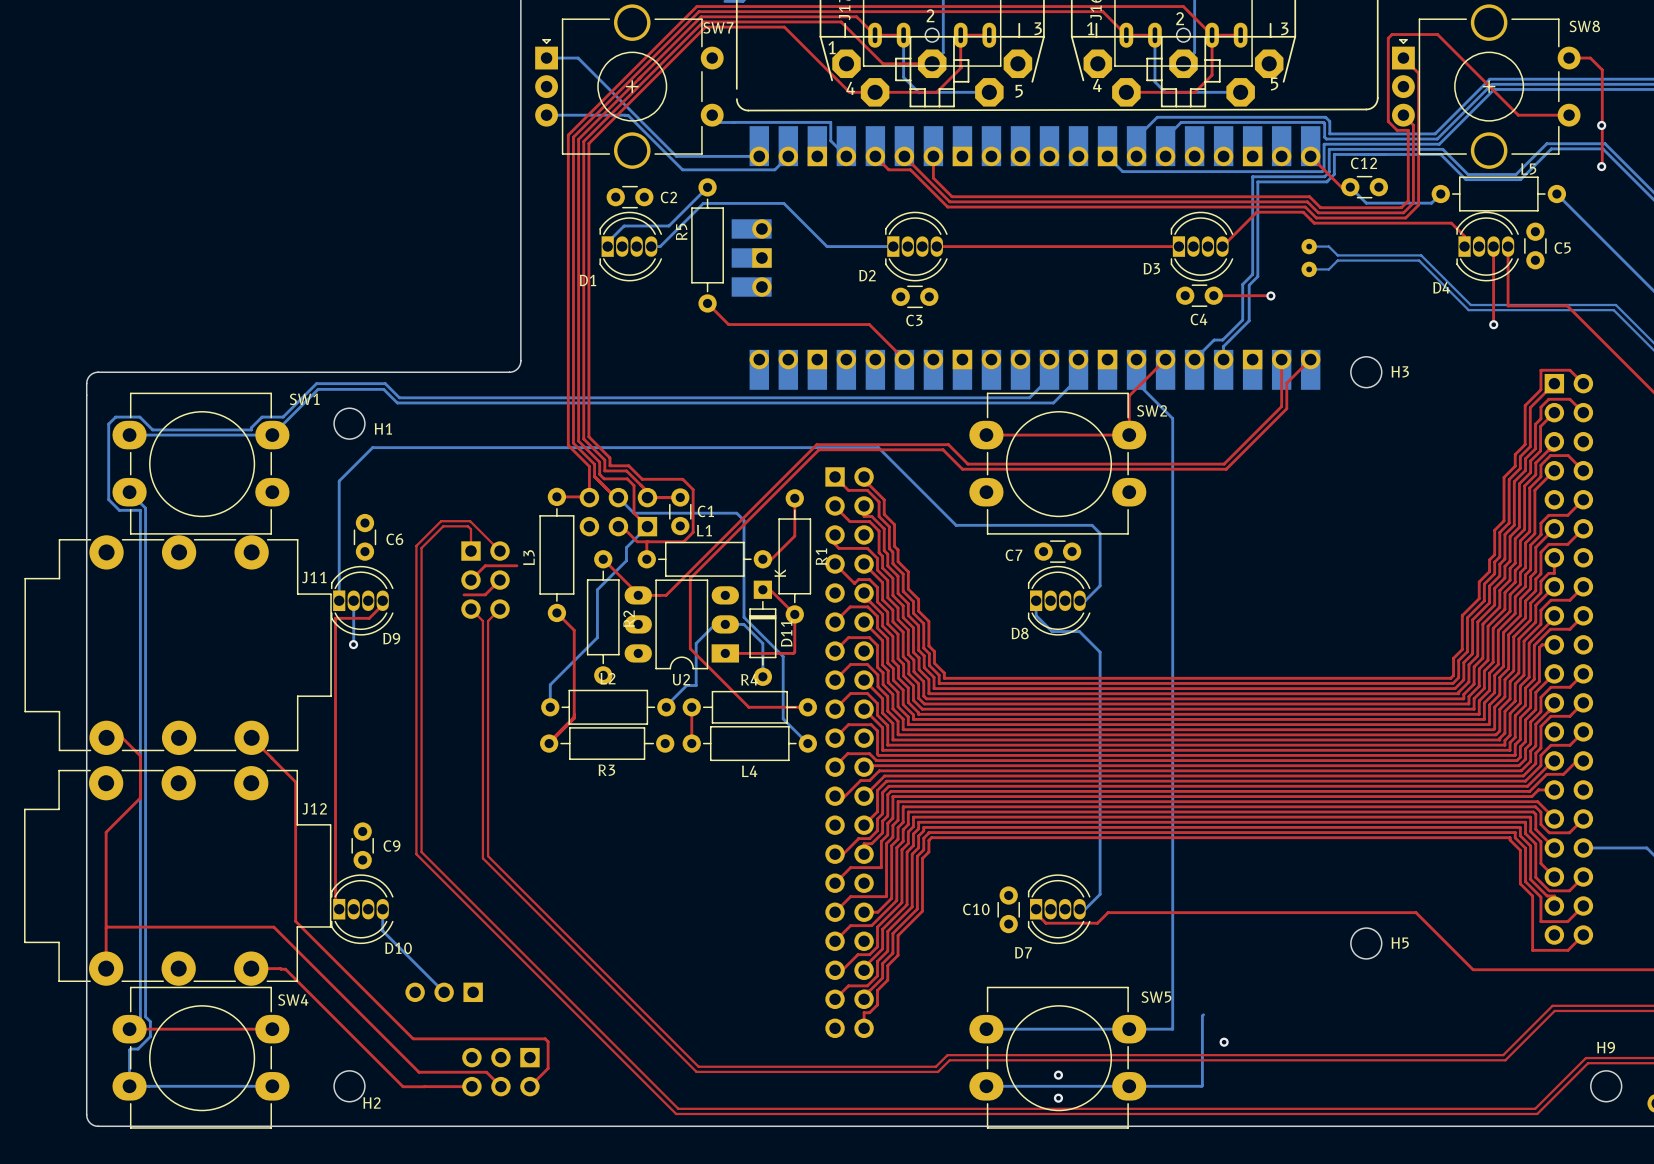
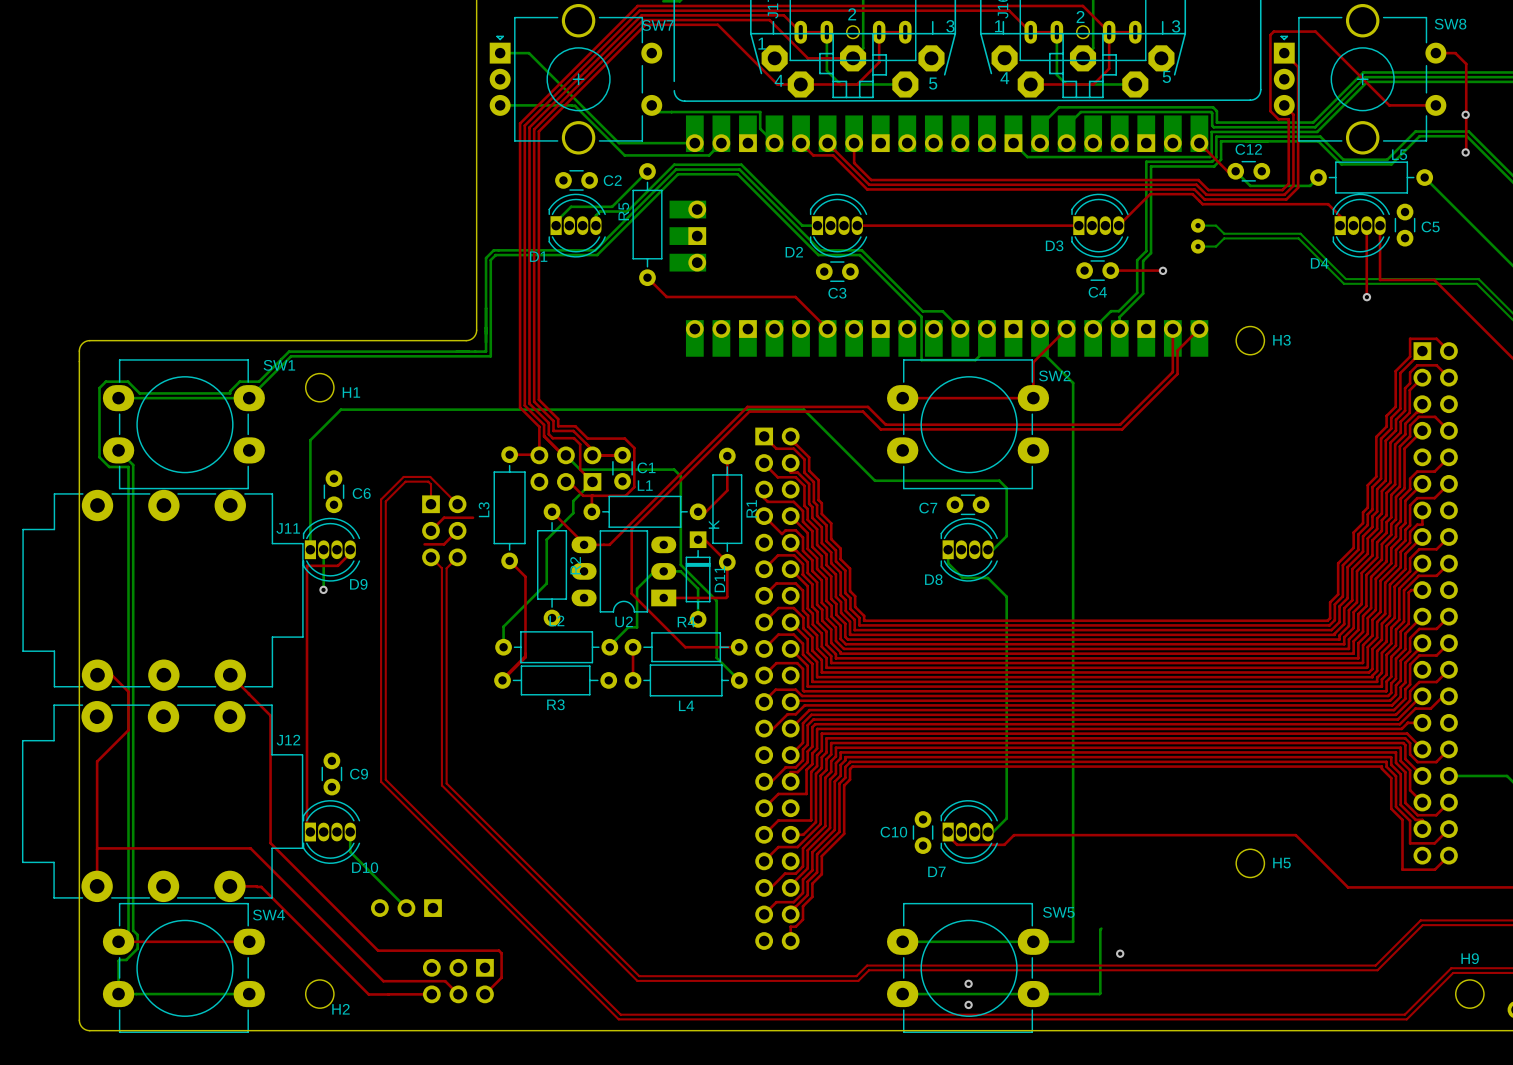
bottom track: (651, 246) (660, 246) (703, 203) (783, 203) (827, 246) (876, 246) -> (595, 225) (595, 215) (600, 211) (627, 211) (674, 164) (741, 164) (802, 225)
bottom track: none -> (495, 255) (490, 260) (490, 356) (351, 356)
bottom track: (1049, 359) (1049, 377) (1029, 397) (399, 397) (385, 383) (315, 384) -> (960, 329) (942, 311) (922, 311) (861, 250) (820, 250) (739, 169) (676, 169) (595, 250) (493, 250) (486, 258) (485, 351) (289, 351)
bottom track: (1078, 377) (1053, 402) (397, 402) (383, 389) -> (986, 345) (986, 348) (975, 360) (921, 360) (921, 316) (859, 255) (818, 255) (737, 174) (678, 174) (597, 255) (495, 255)

